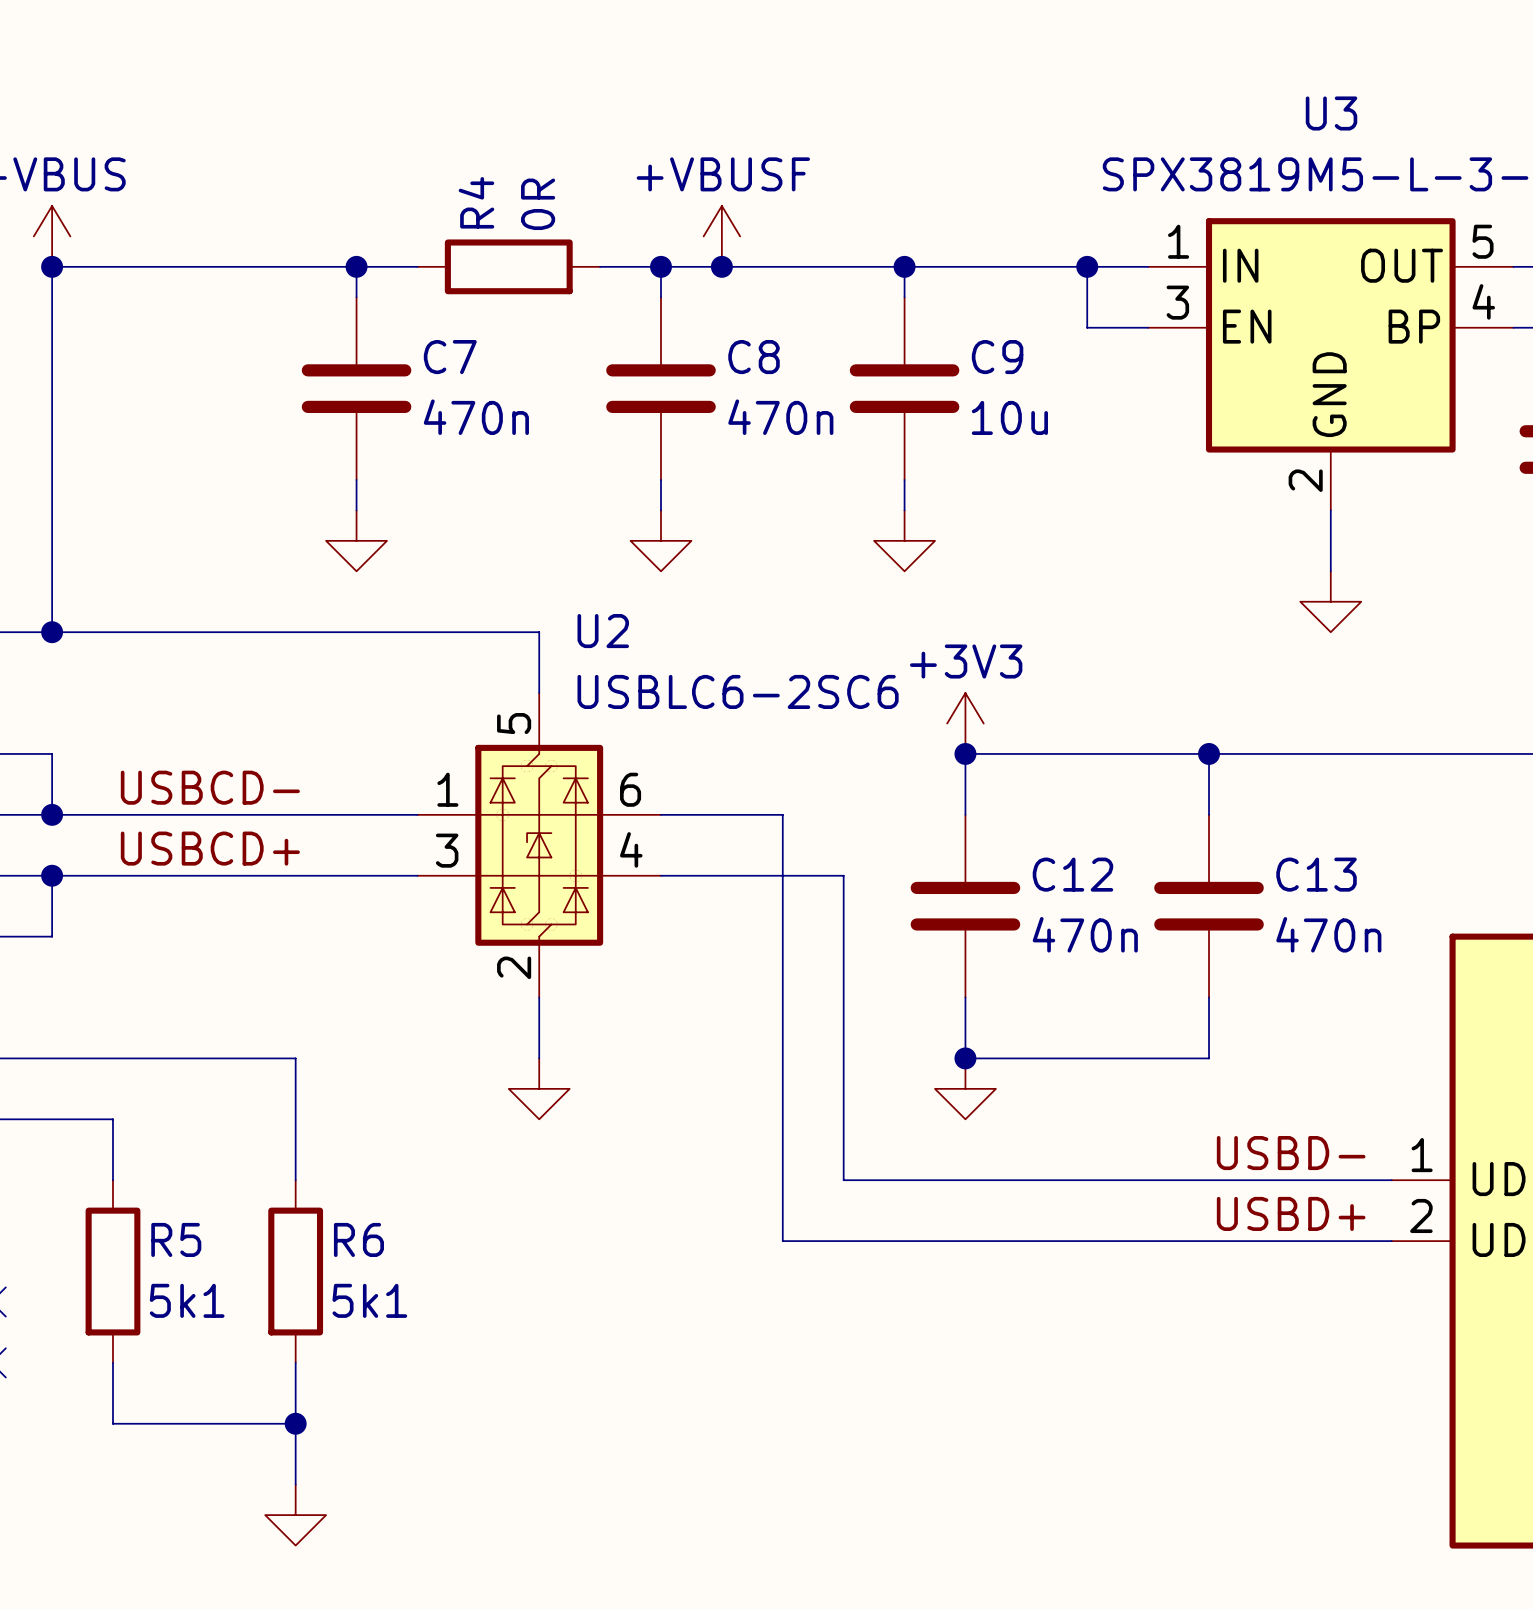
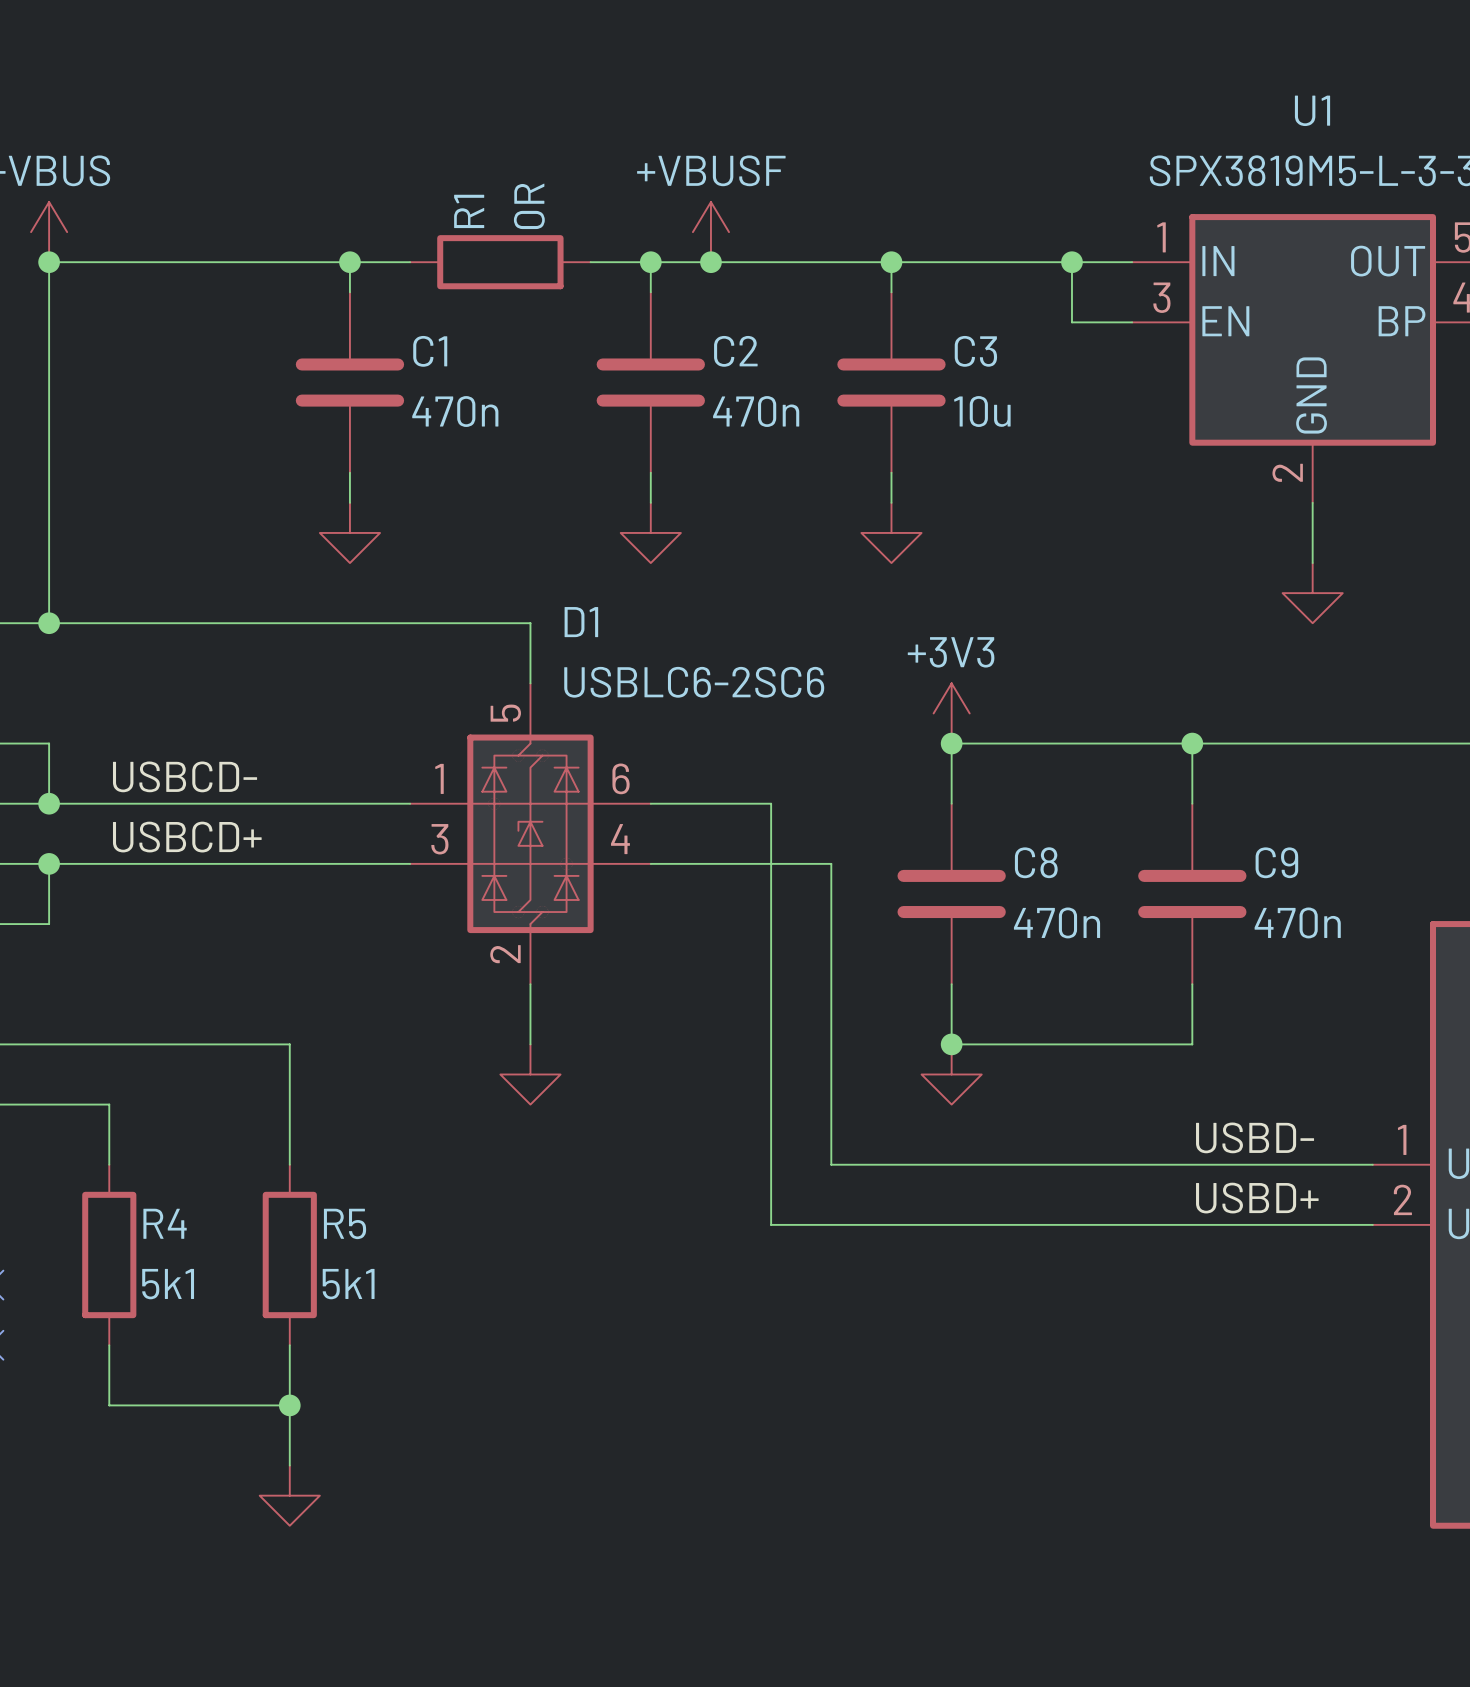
U3 name: U3 (1331, 113) -> U1 (1312, 110)
R4 name: R4 (476, 202) -> R1 (469, 211)
C7 name: C7 (450, 357) -> C1 (430, 351)
C8 name: C8 (754, 357) -> C2 (735, 351)
C9 name: C9 (997, 357) -> C3 (975, 351)
U2 name: U2 (603, 631) -> D1 (581, 622)
C12 name: C12 (1072, 874) -> C8 (1036, 862)
C13 name: C13 (1316, 874) -> C9 (1276, 862)
R5 name: R5 (176, 1239) -> R4 (165, 1223)
R6 name: R6 (358, 1239) -> R5 (345, 1223)

